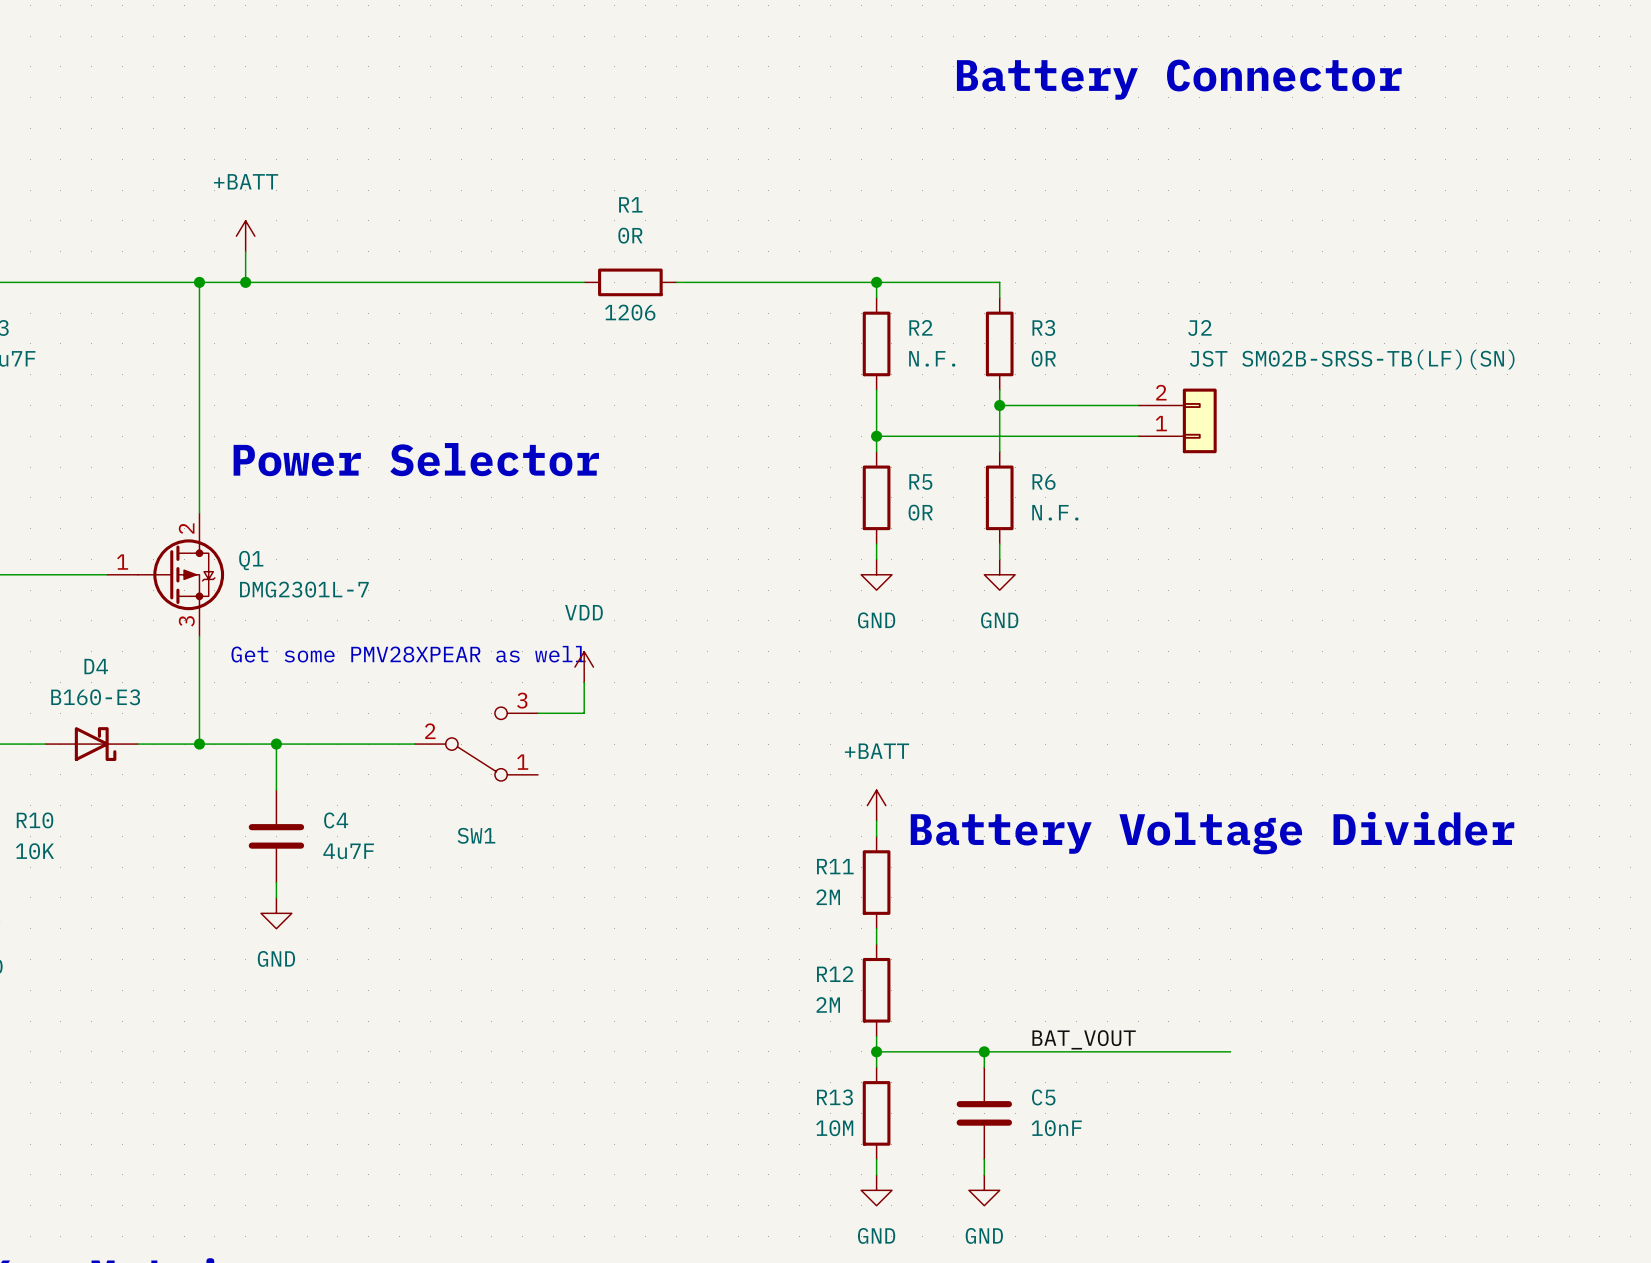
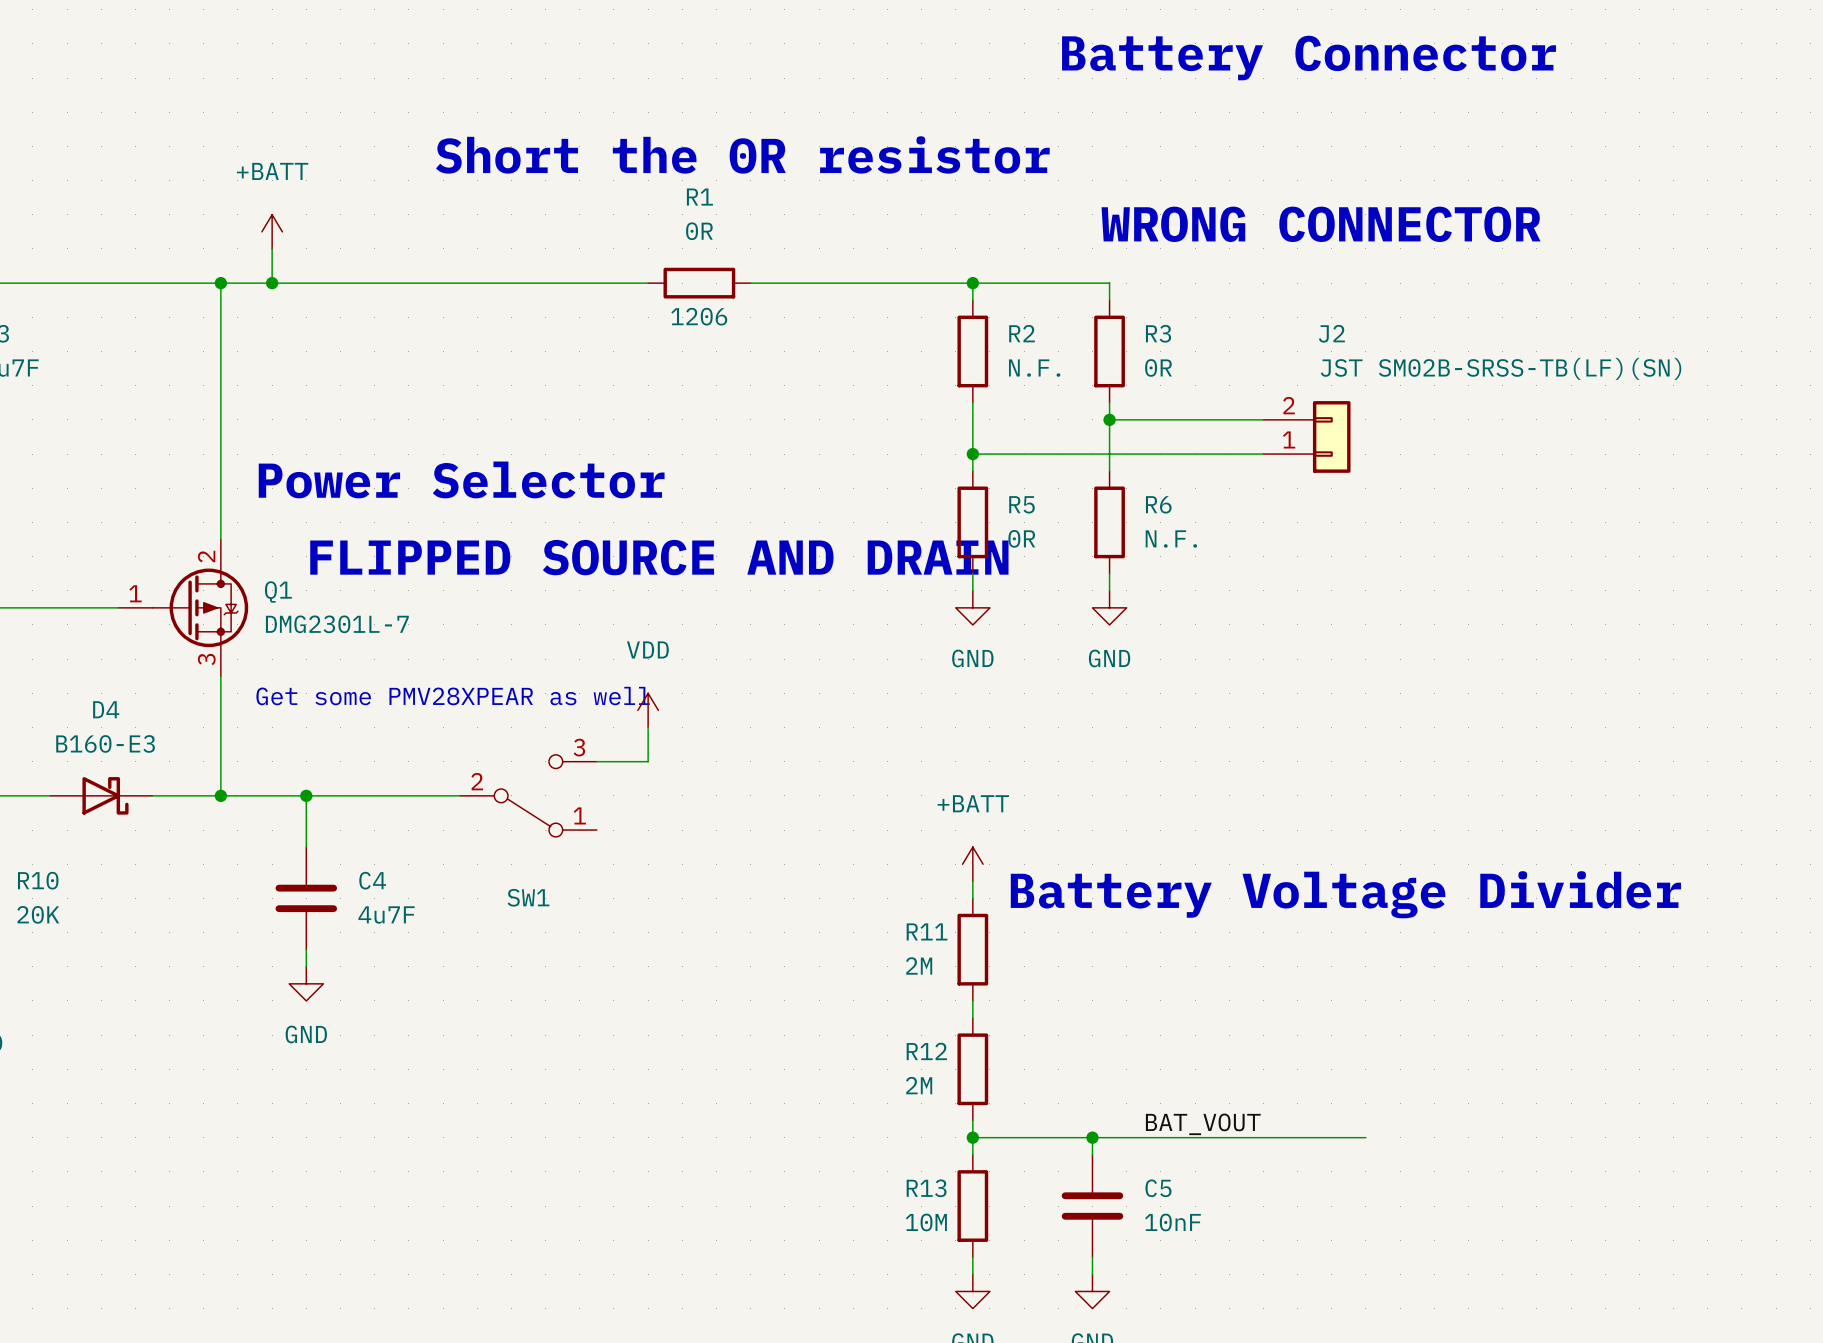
text: none -> Short the 0R resistor (742, 154)
text: none -> WRONG CONNECTOR (1321, 224)
text: none -> FLIPPED SOURCE AND DRAIN (659, 557)
R10 value: 10K (34, 851) -> 20K (38, 914)

